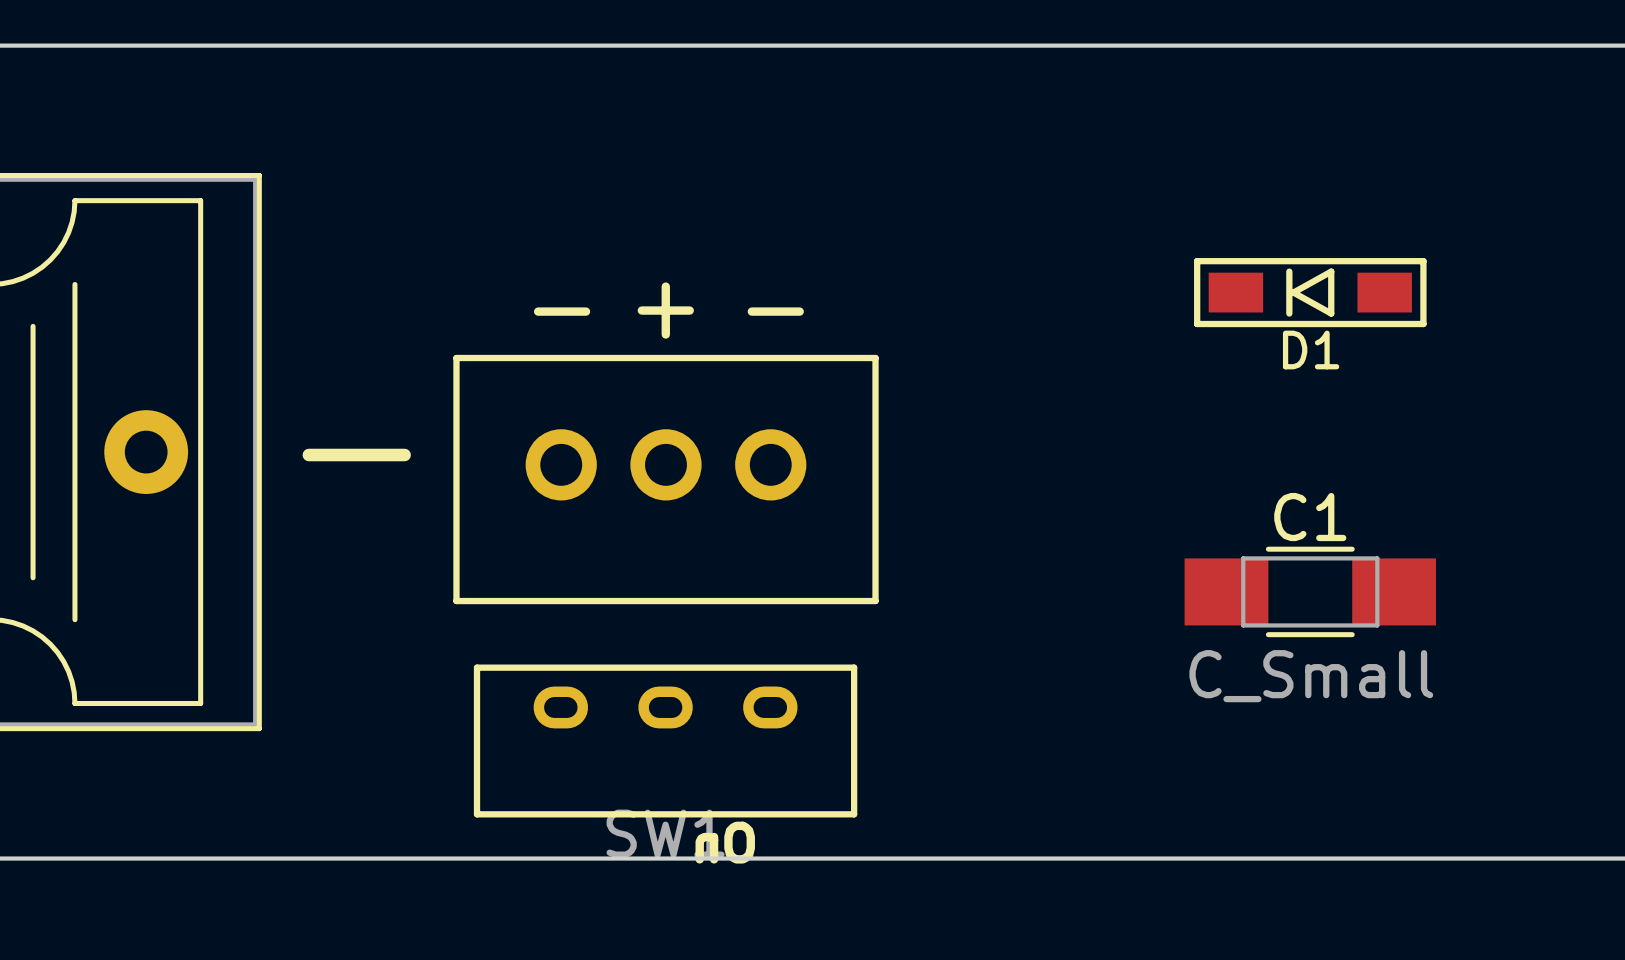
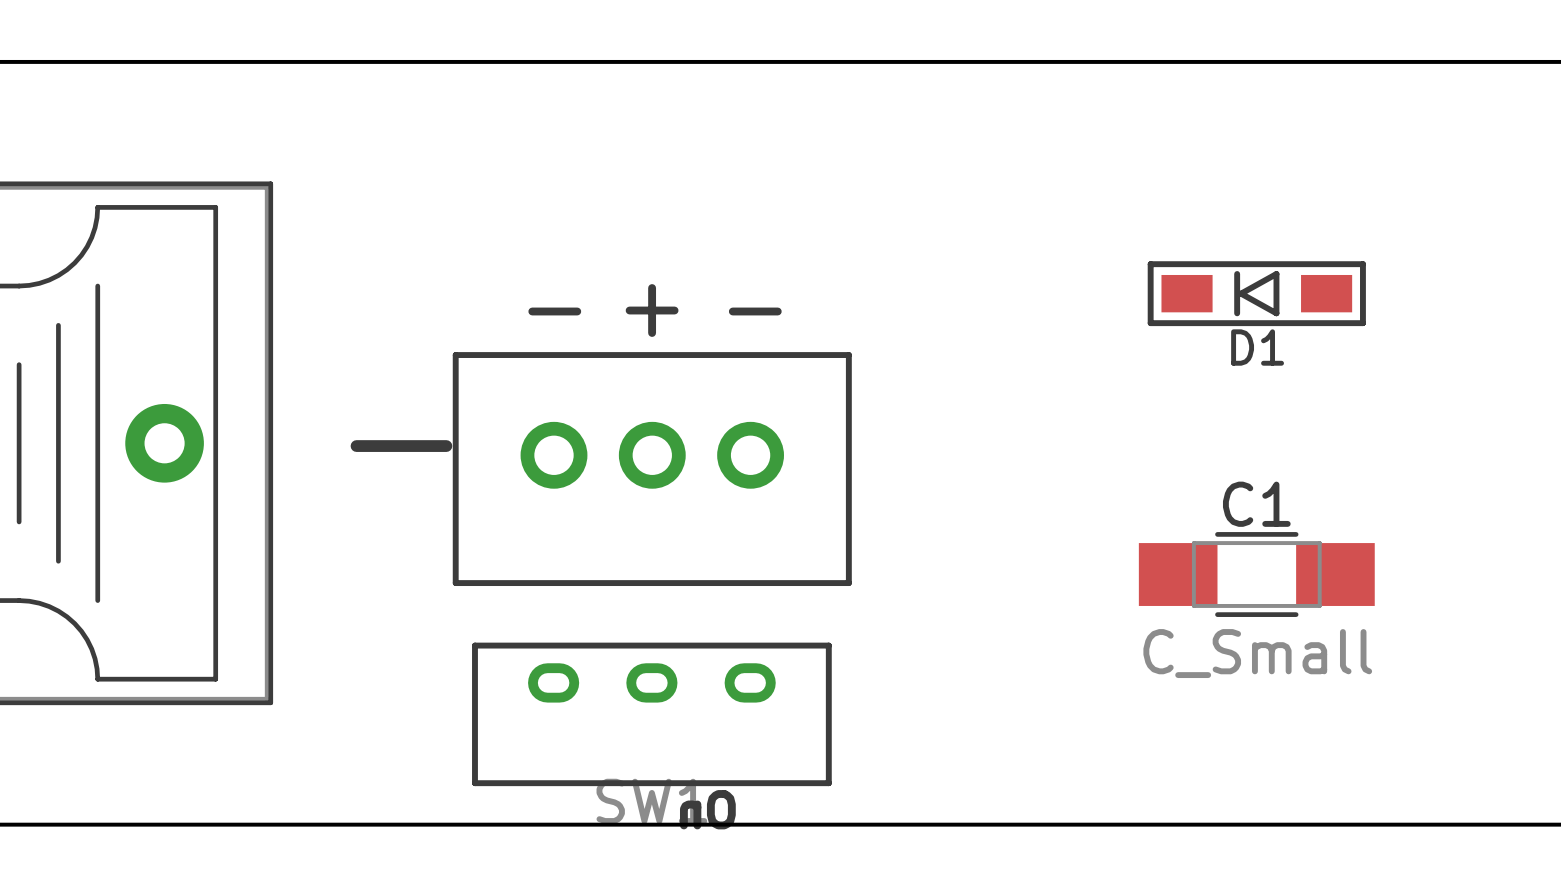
part text position: - (356, 455) -> - (401, 446)

